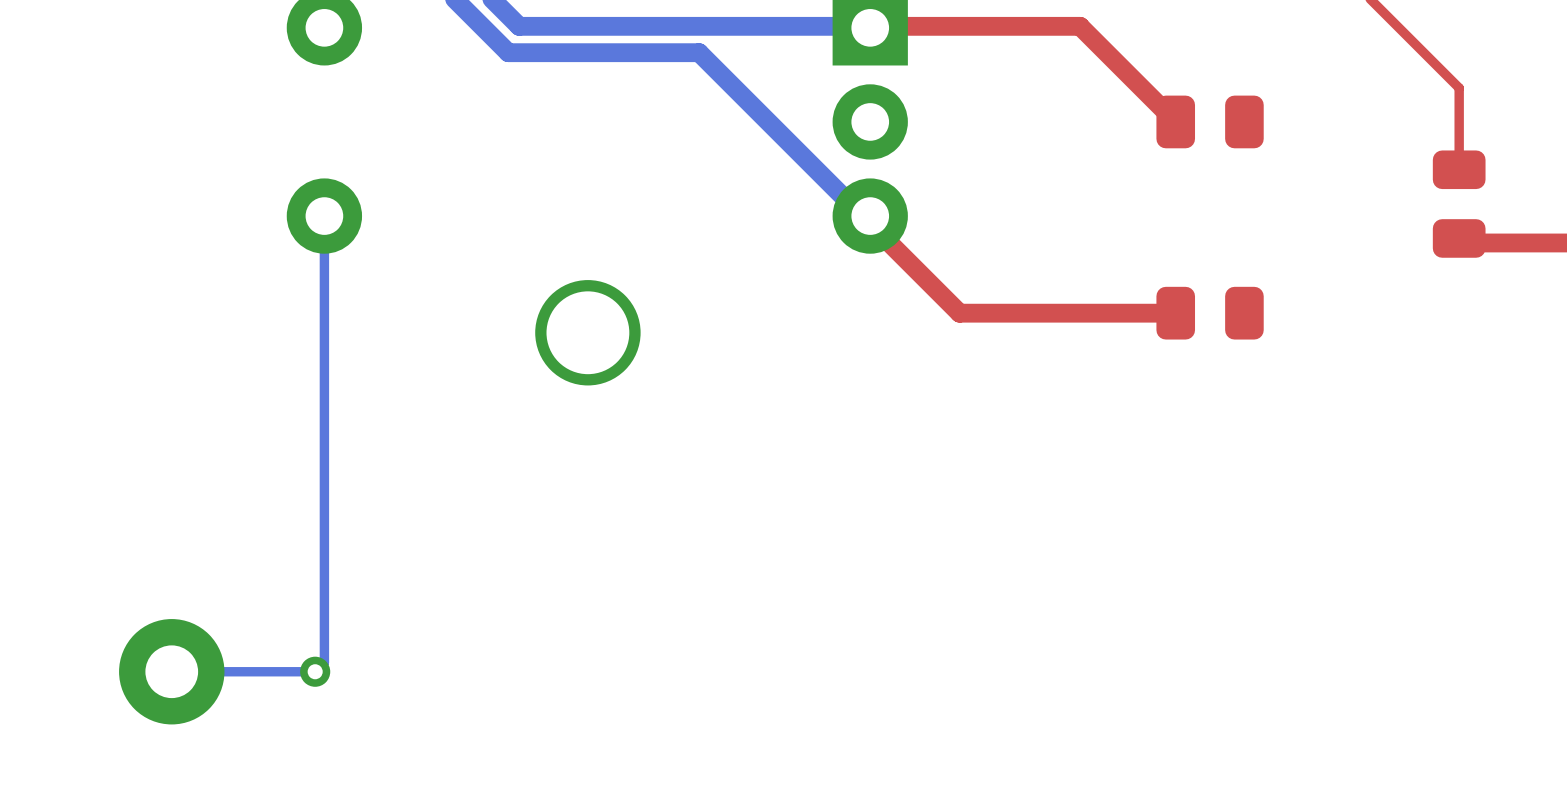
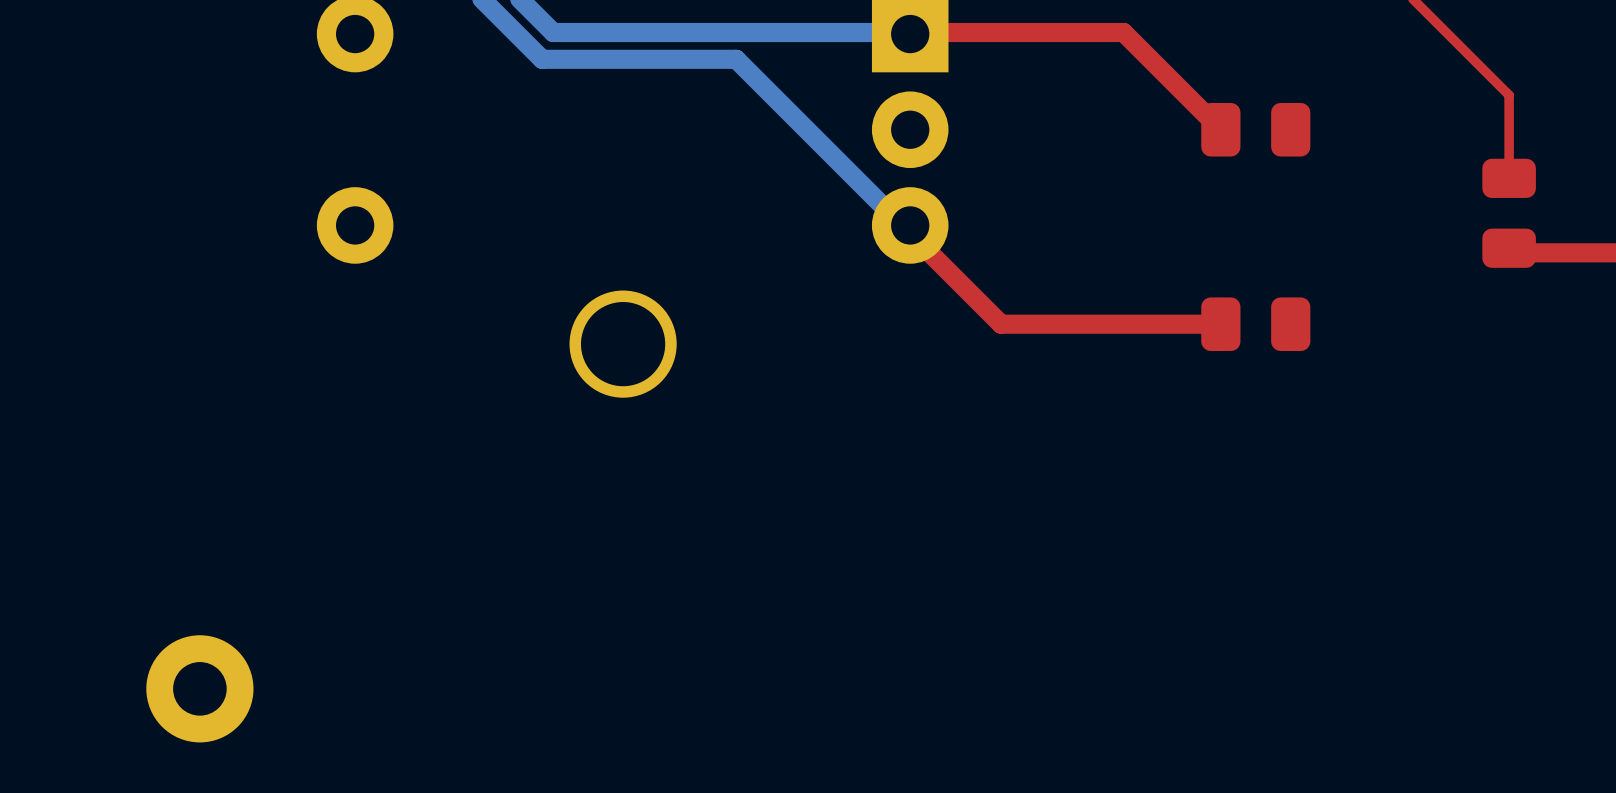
bottom track: (324, 216) (324, 662) (315, 671) (171, 671) -> none
via: (315, 671) -> none

